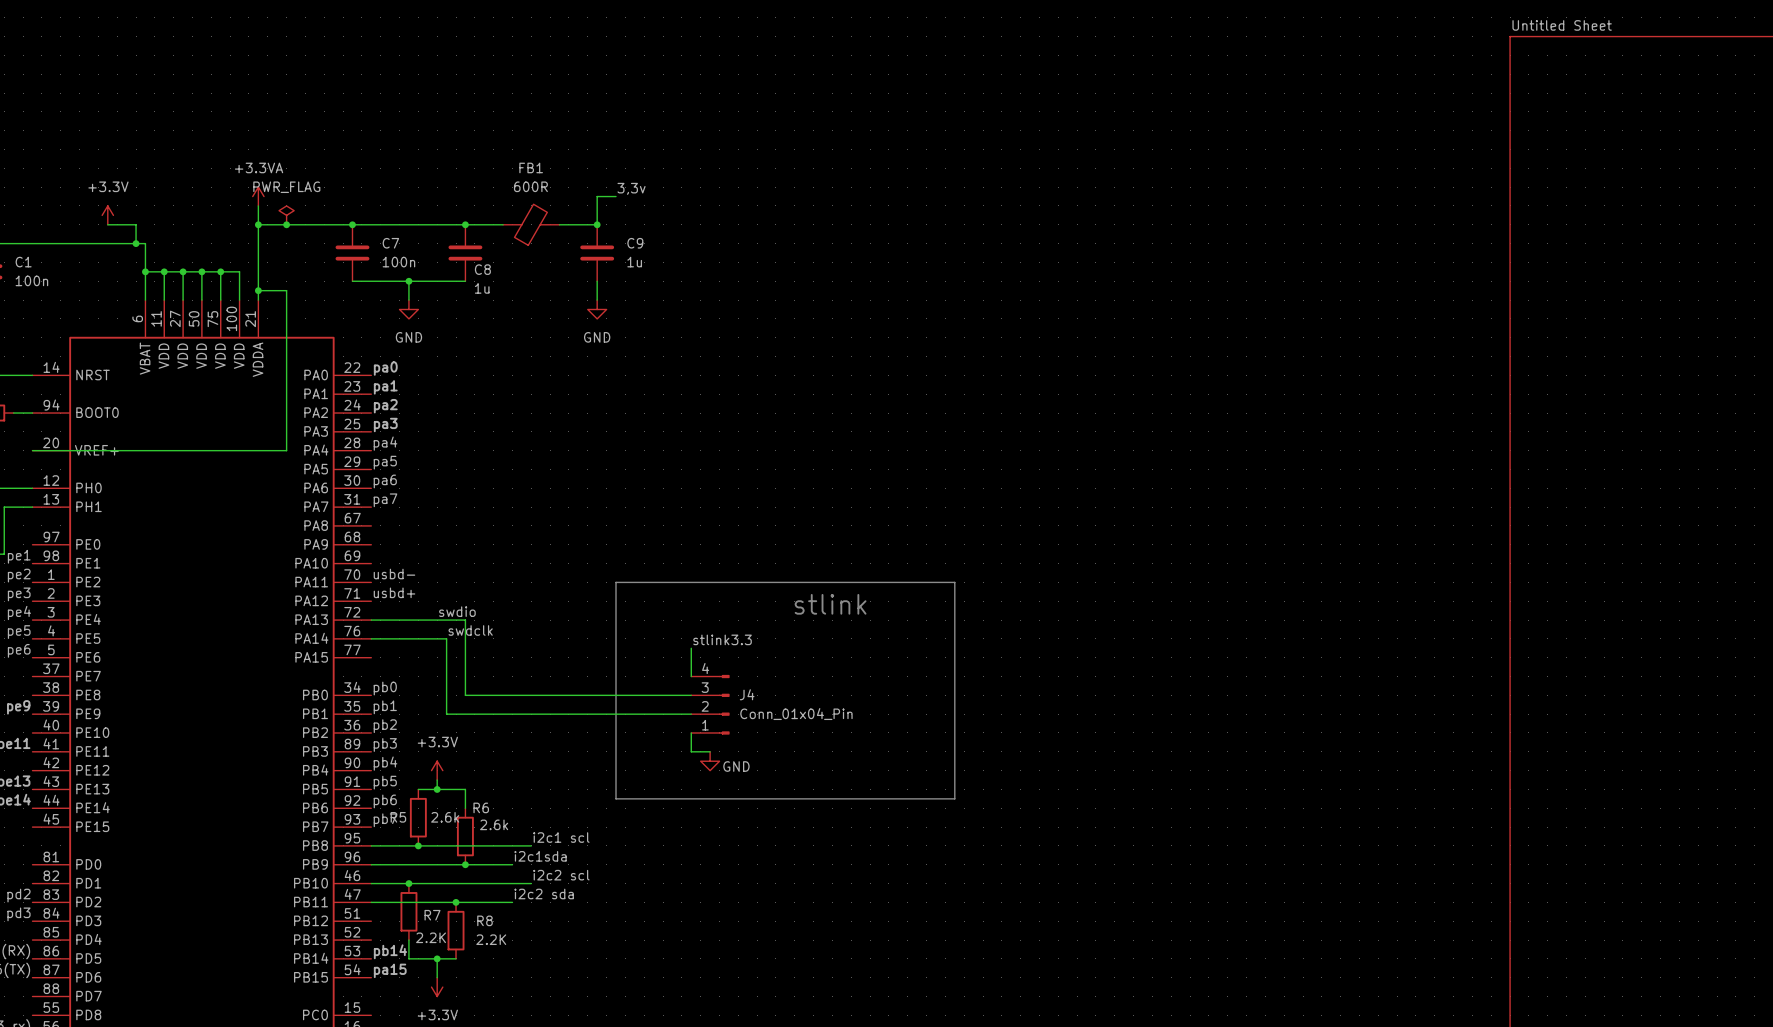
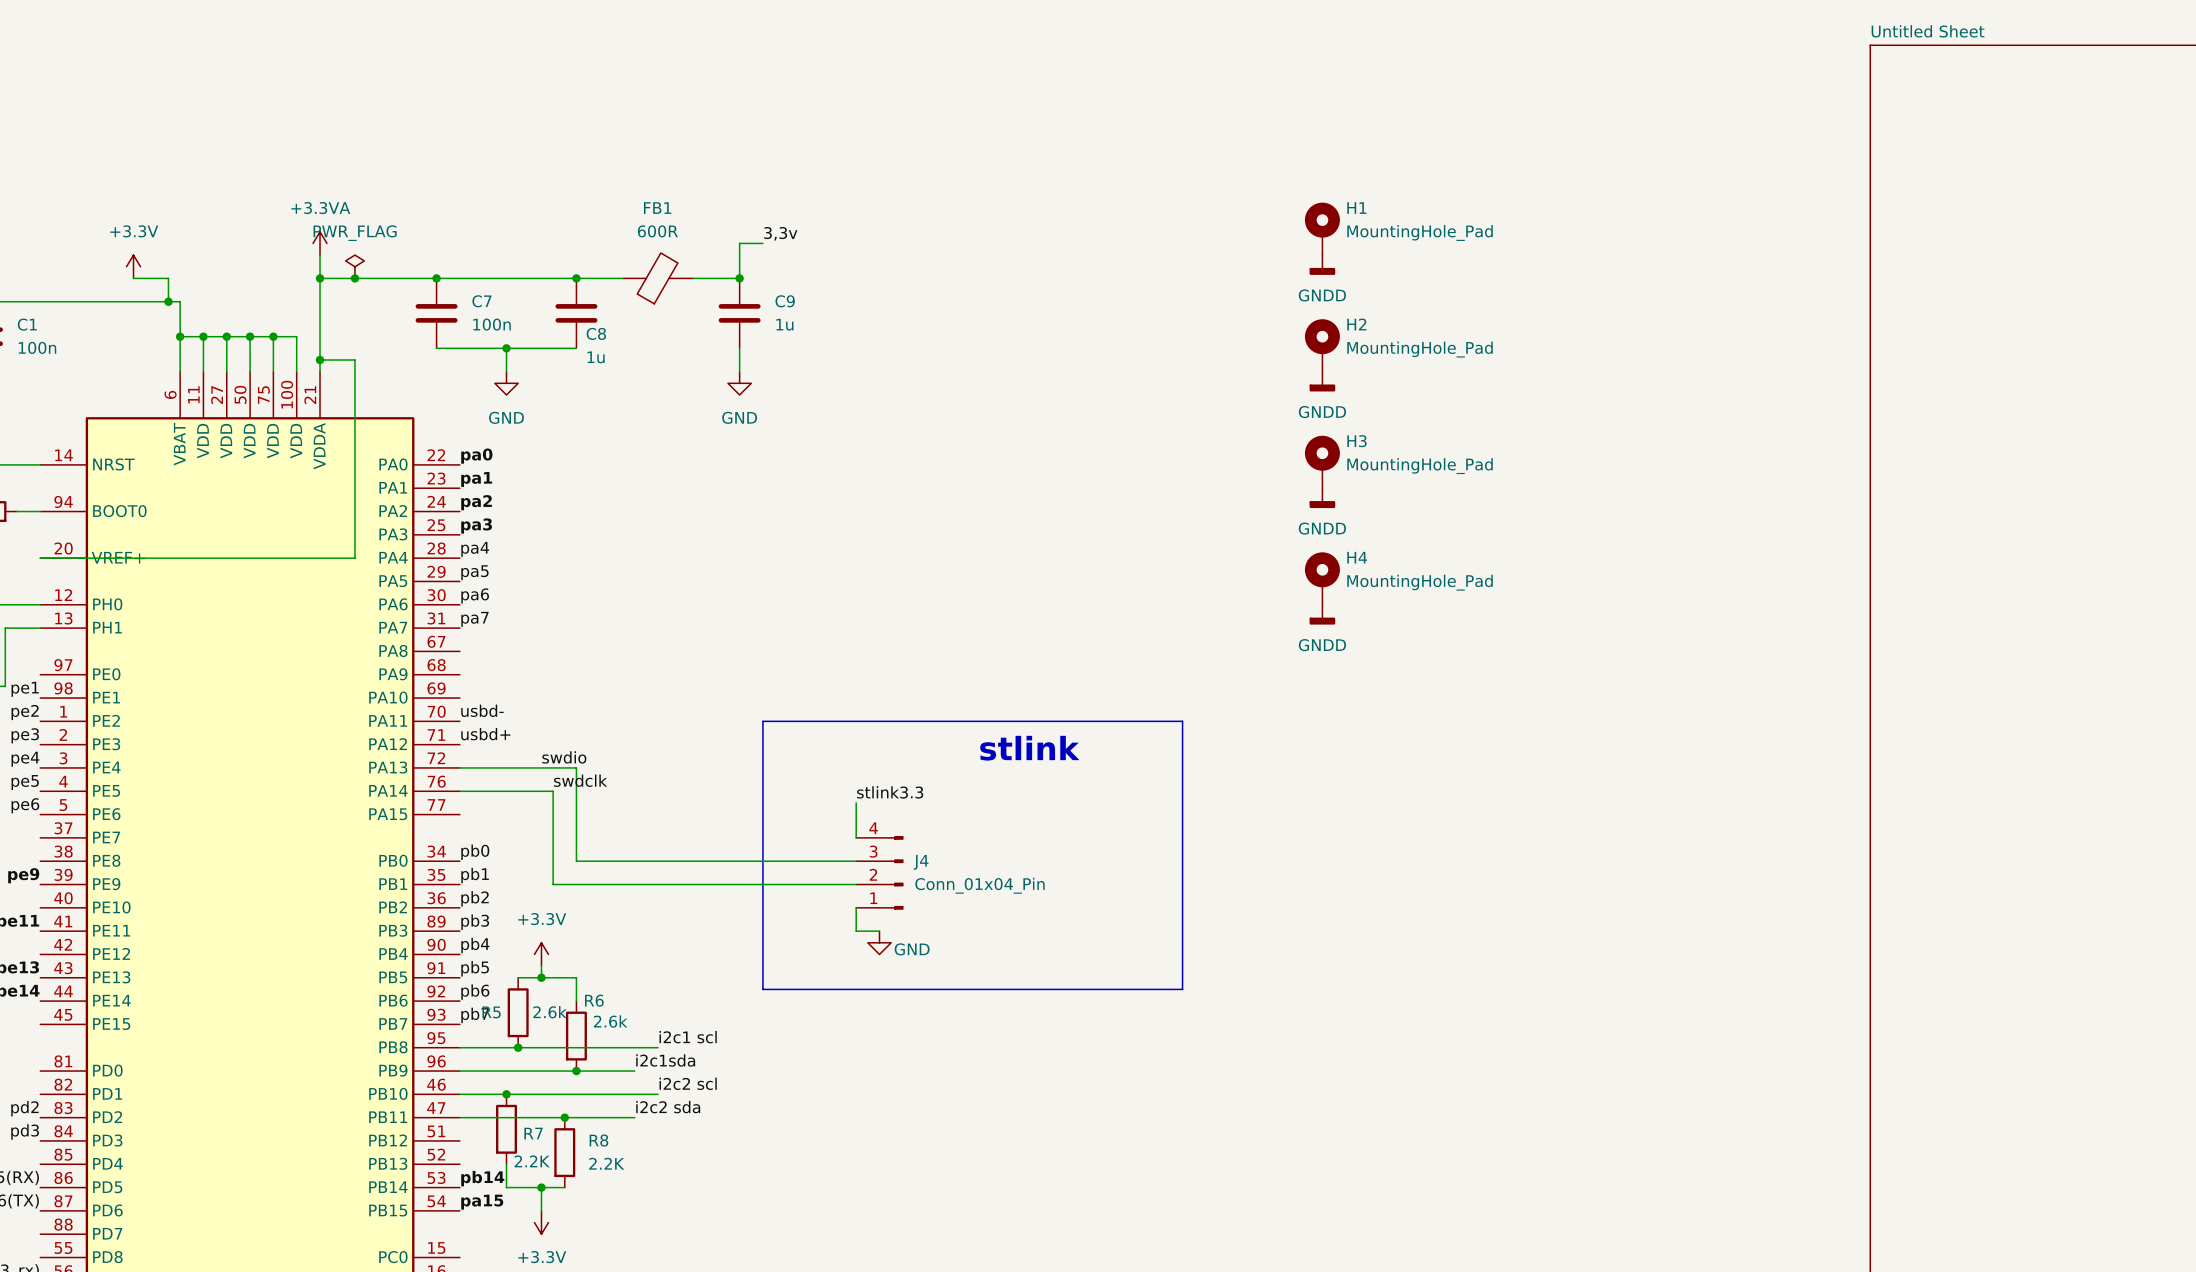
H1: none -> MountingHole_Pad (1322, 228)
power symbol: none -> GNDD (1322, 265)
H2: none -> MountingHole_Pad (1322, 345)
power symbol: none -> GNDD (1322, 381)
H3: none -> MountingHole_Pad (1322, 461)
power symbol: none -> GNDD (1322, 498)
H4: none -> MountingHole_Pad (1322, 578)
power symbol: none -> GNDD (1322, 614)

